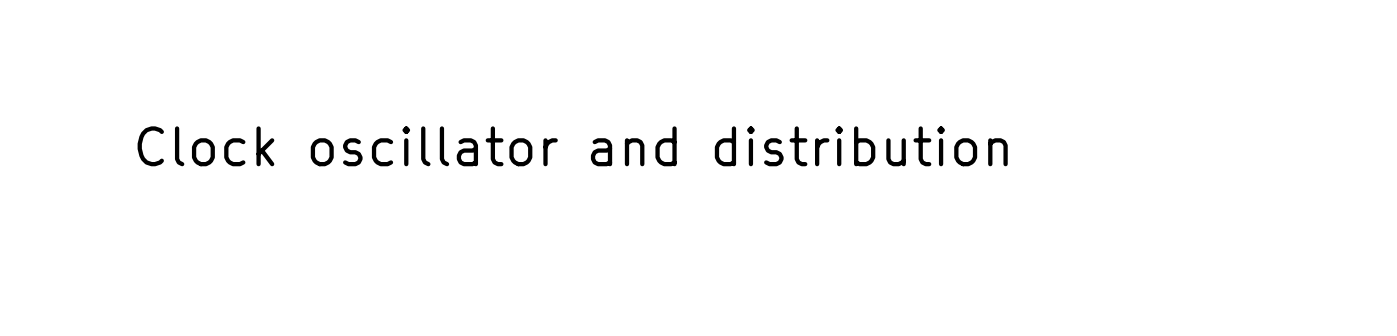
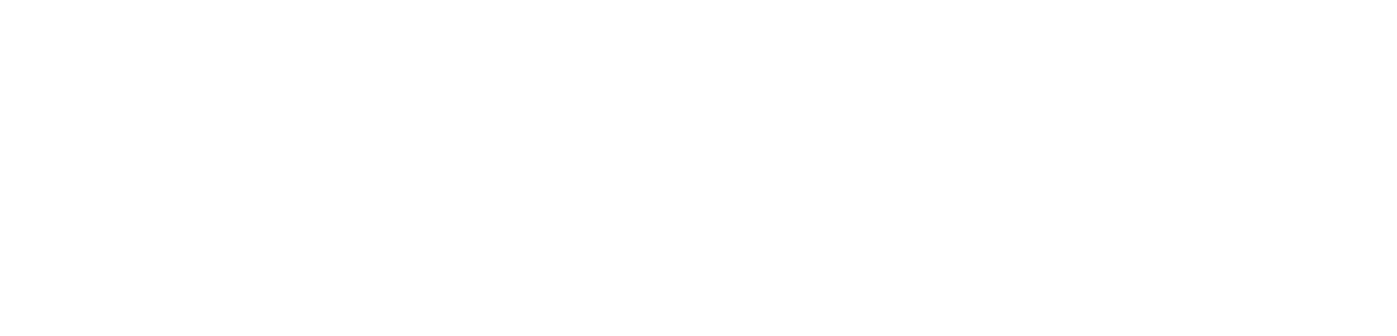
text: Clock oscillator and distribution (572, 146) -> none

